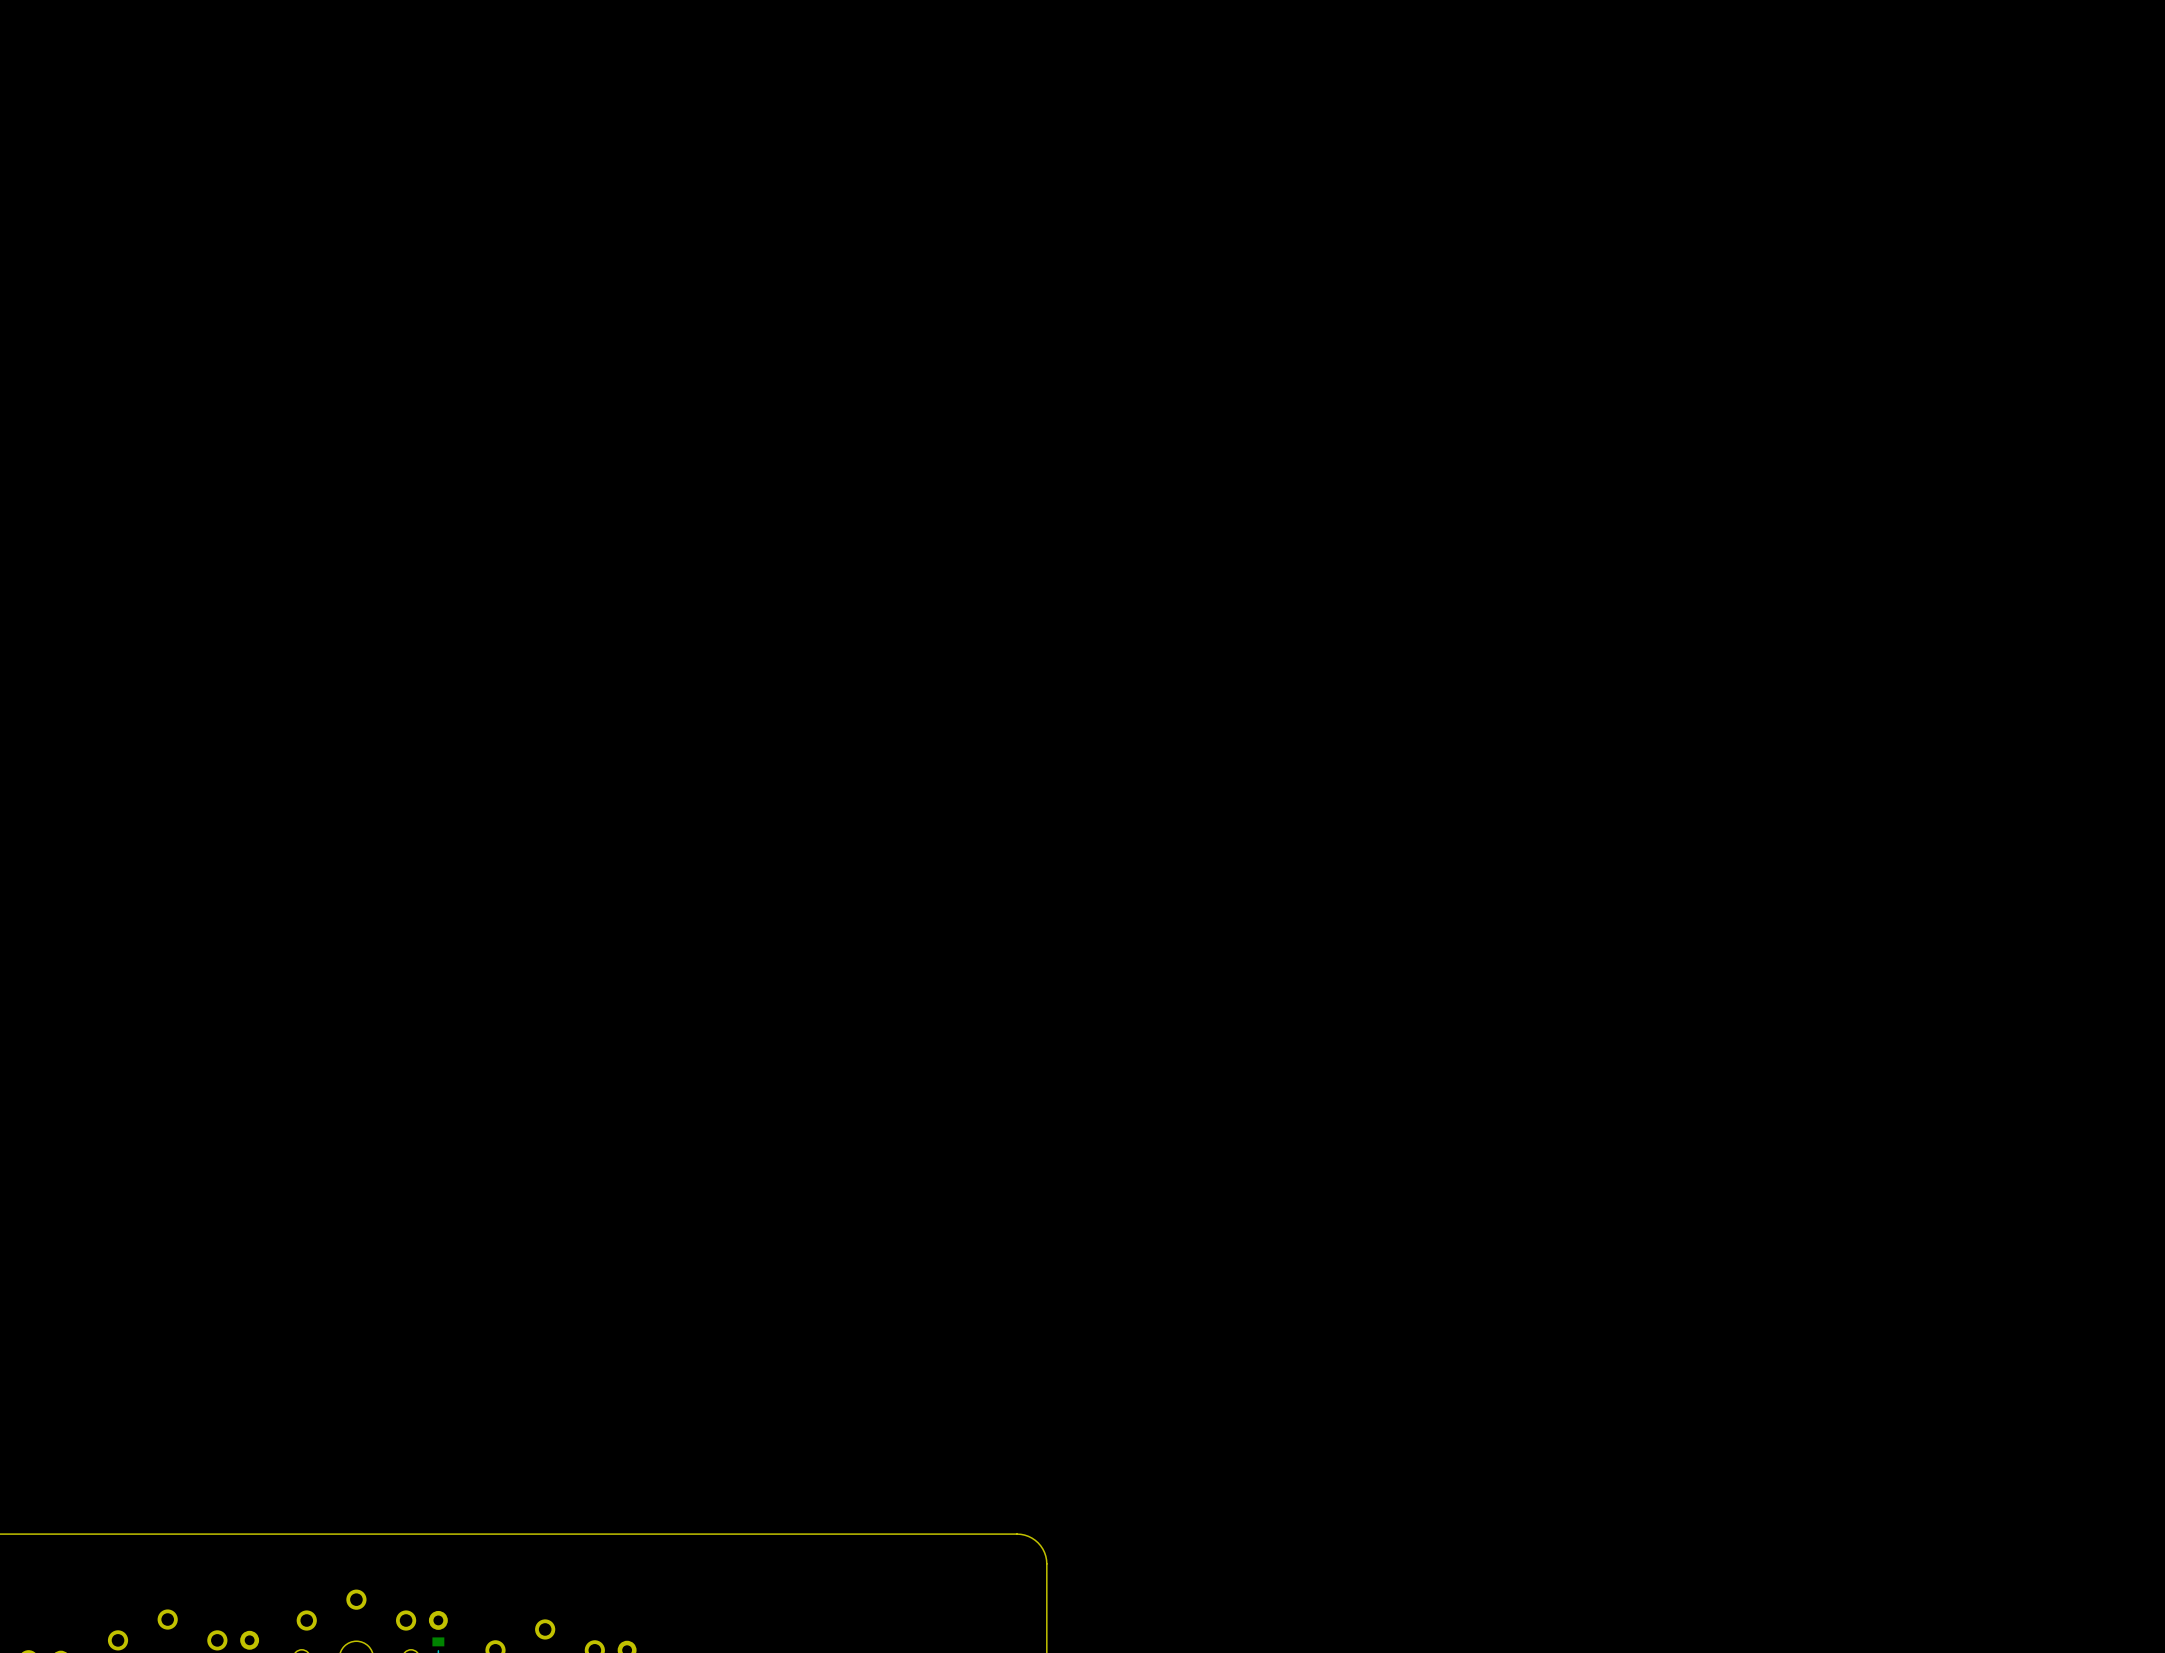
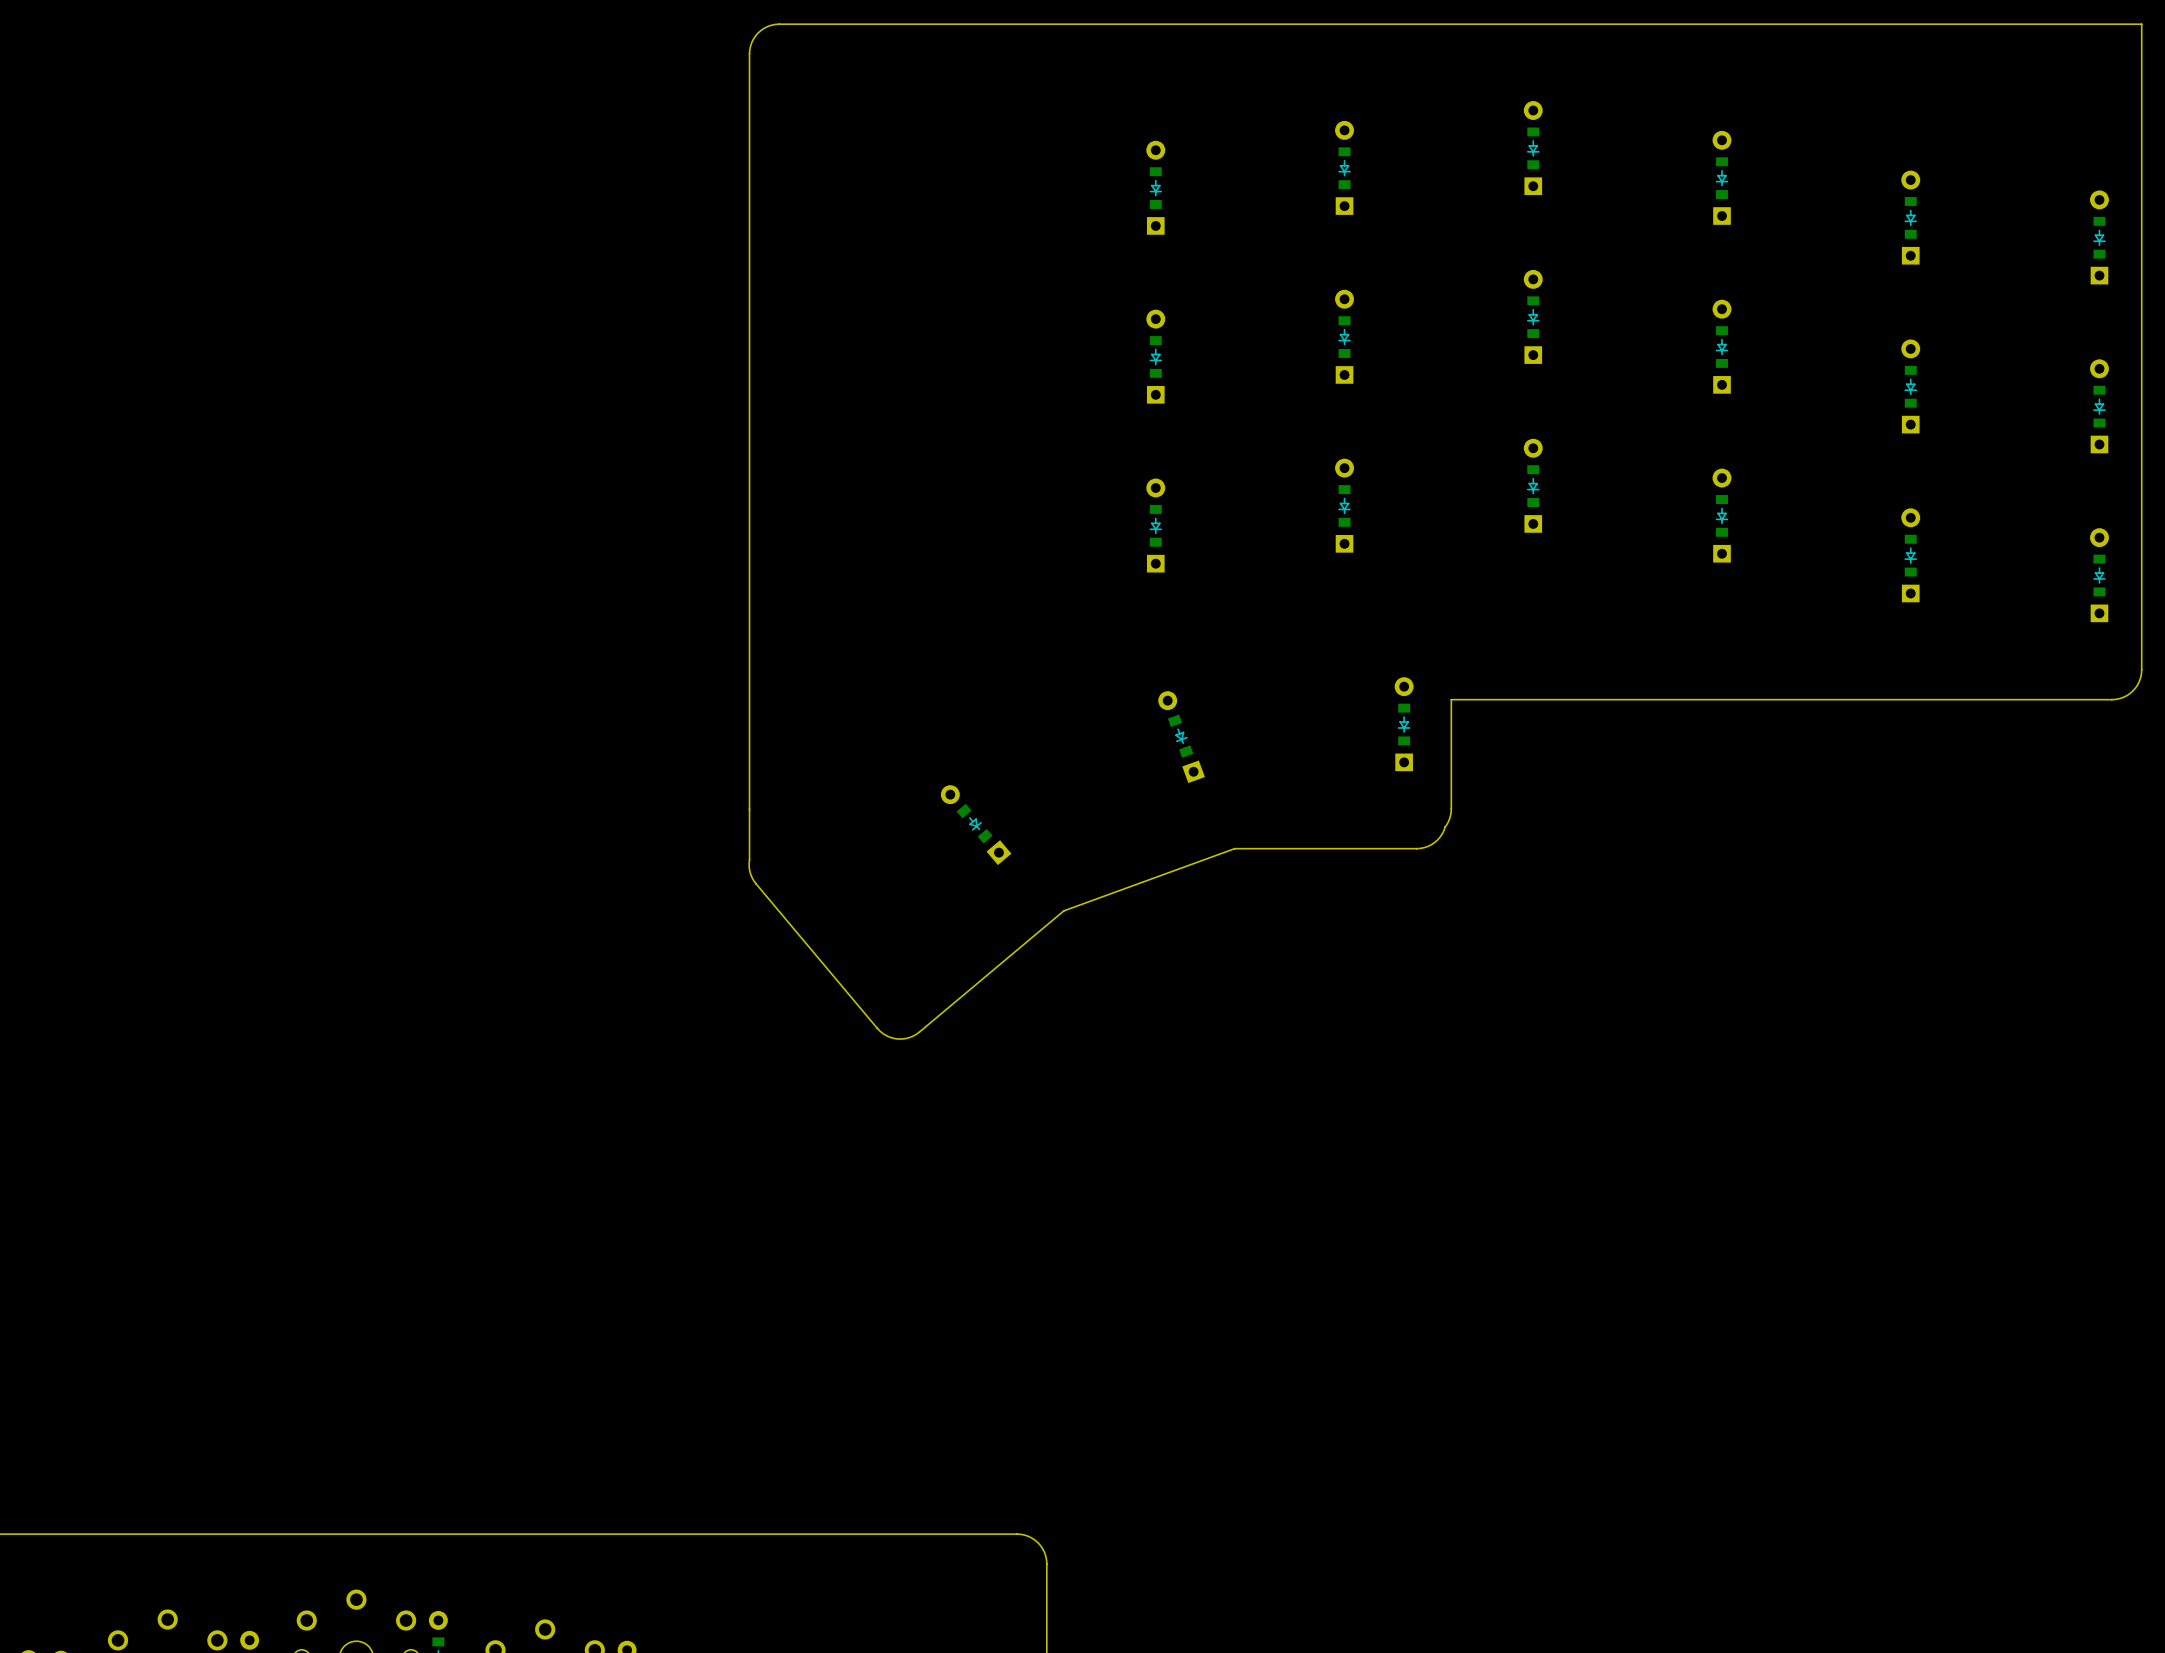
board edge: none -> (2141, 24) (2141, 669) (2137, 684) (2126, 695) (2111, 699) (1451, 699) (1451, 812) (1442, 834) (1431, 844) (1416, 848) (1234, 848) (1063, 910) (919, 1032) (905, 1038) (893, 1038) (880, 1031) (754, 881) (749, 866) (749, 53) (753, 39) (764, 28) (779, 24) (2141, 24)
part: none -> (1533, 148)
part: none -> (1344, 167)
part: none -> (1722, 177)
part: none -> (1155, 187)
part: none -> (1910, 217)
part: none -> (2099, 237)
part: none -> (1533, 316)
part: none -> (1344, 336)
part: none -> (1722, 346)
part: none -> (1155, 356)
part: none -> (1910, 386)
part: none -> (2099, 406)
part: none -> (1533, 485)
part: none -> (1344, 505)
part: none -> (1722, 515)
part: none -> (1155, 525)
part: none -> (1910, 555)
part: none -> (2099, 575)
part: none -> (1404, 724)
part: none -> (1181, 737)
part: none -> (976, 825)

